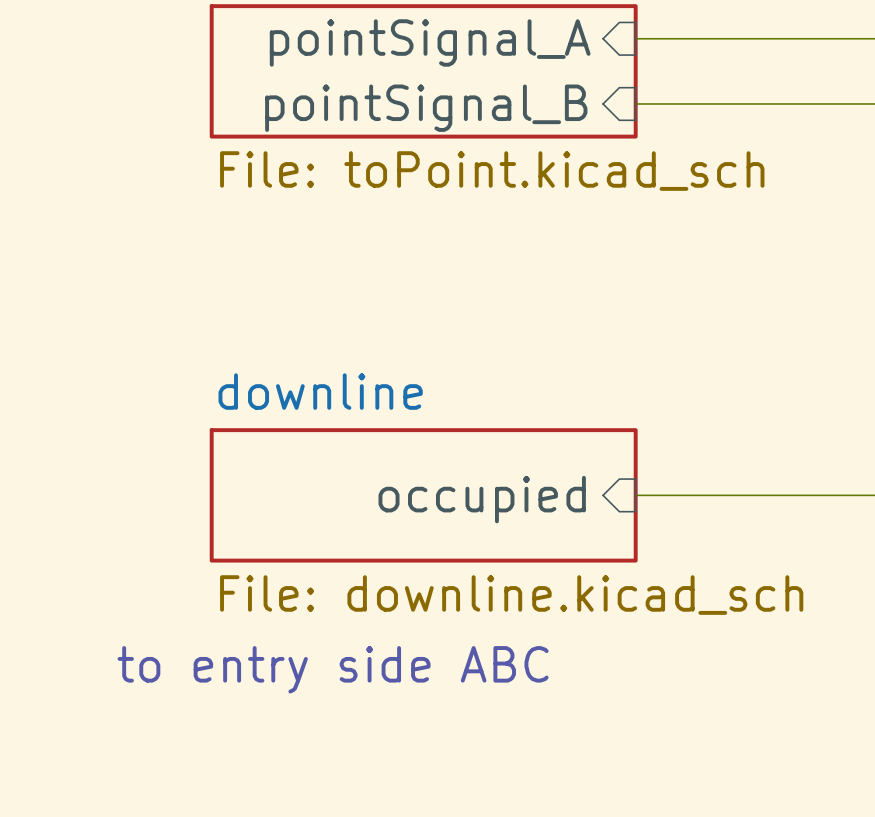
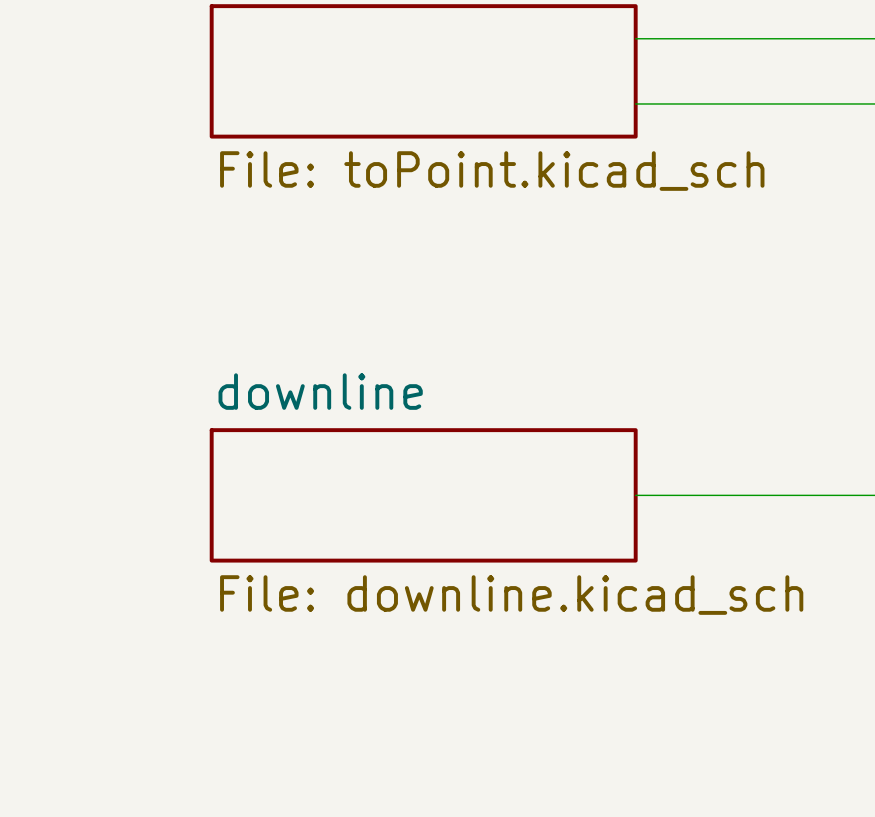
sheet pin: pointSignal_A (430, 42) -> none
sheet pin: pointSignal_B (426, 108) -> none
sheet pin: occupied (482, 499) -> none
text: to entry side ABC (333, 669) -> none

